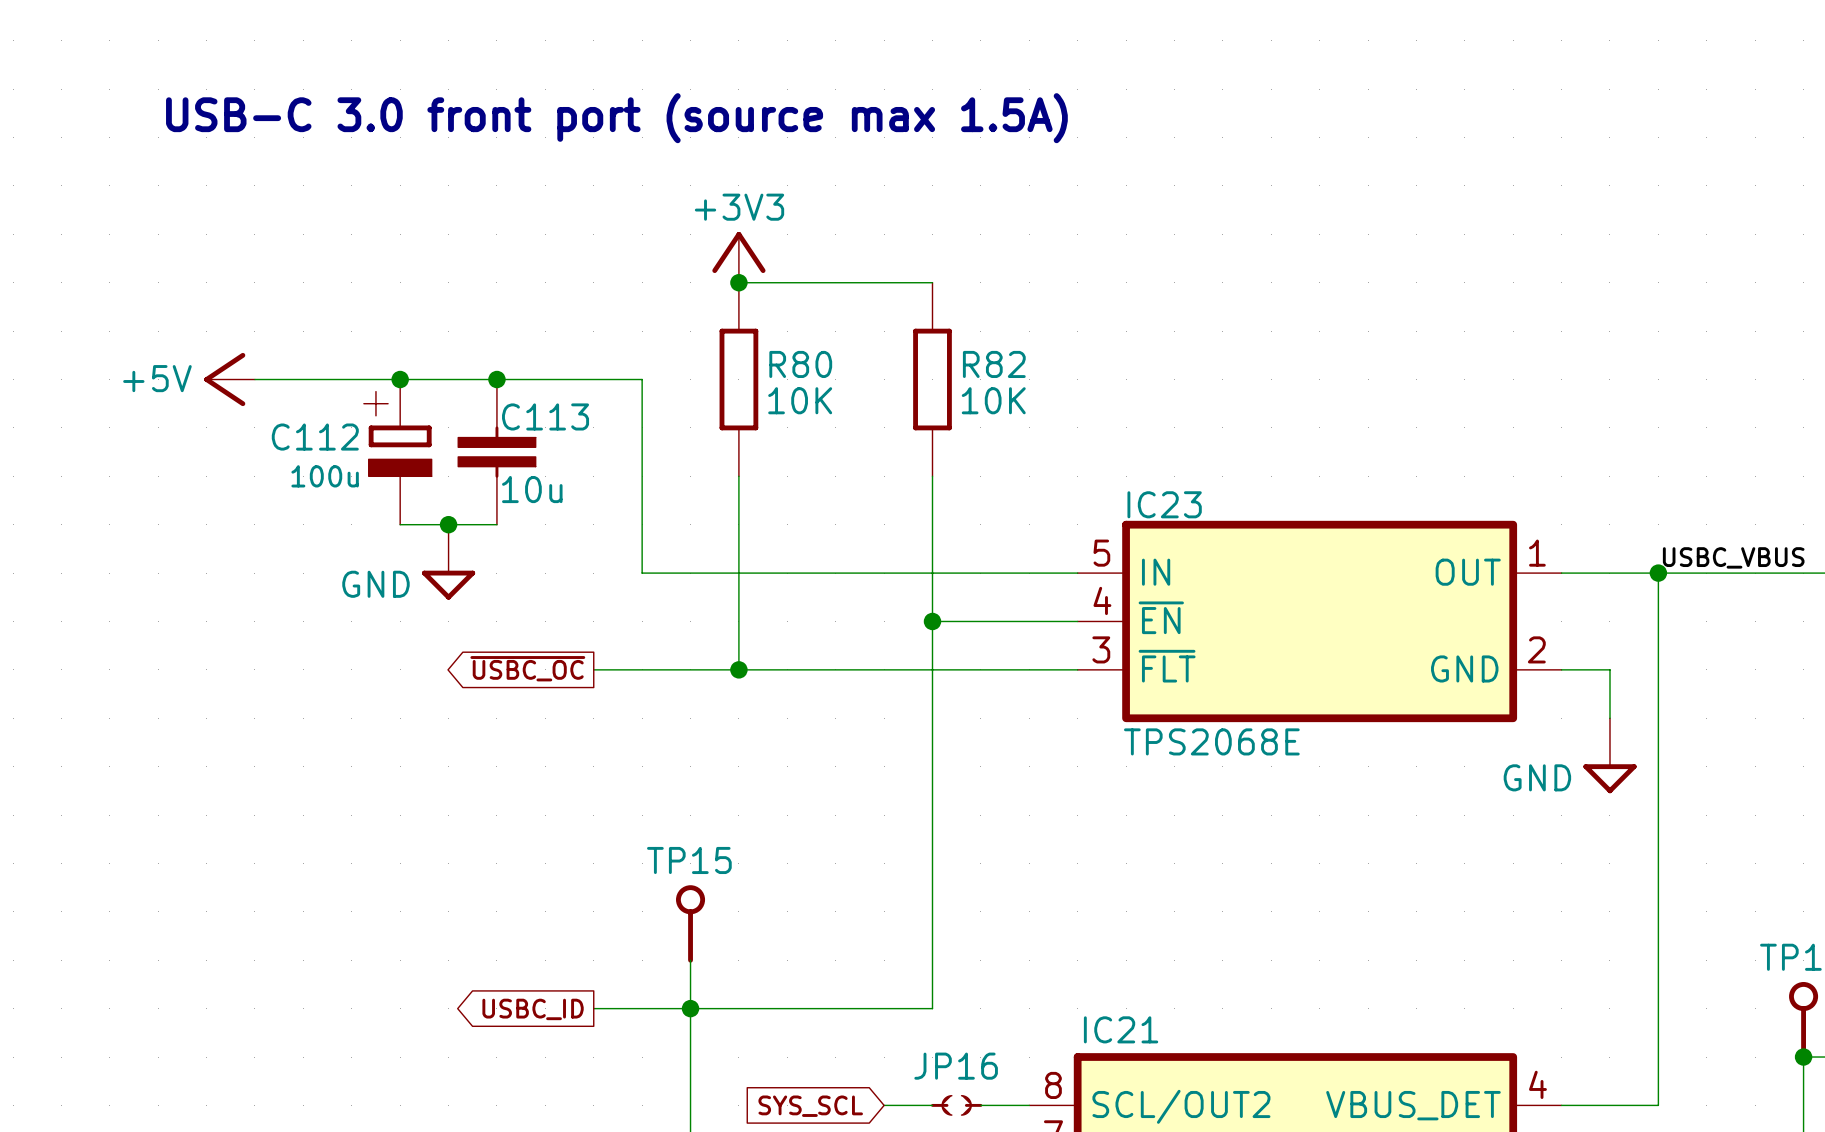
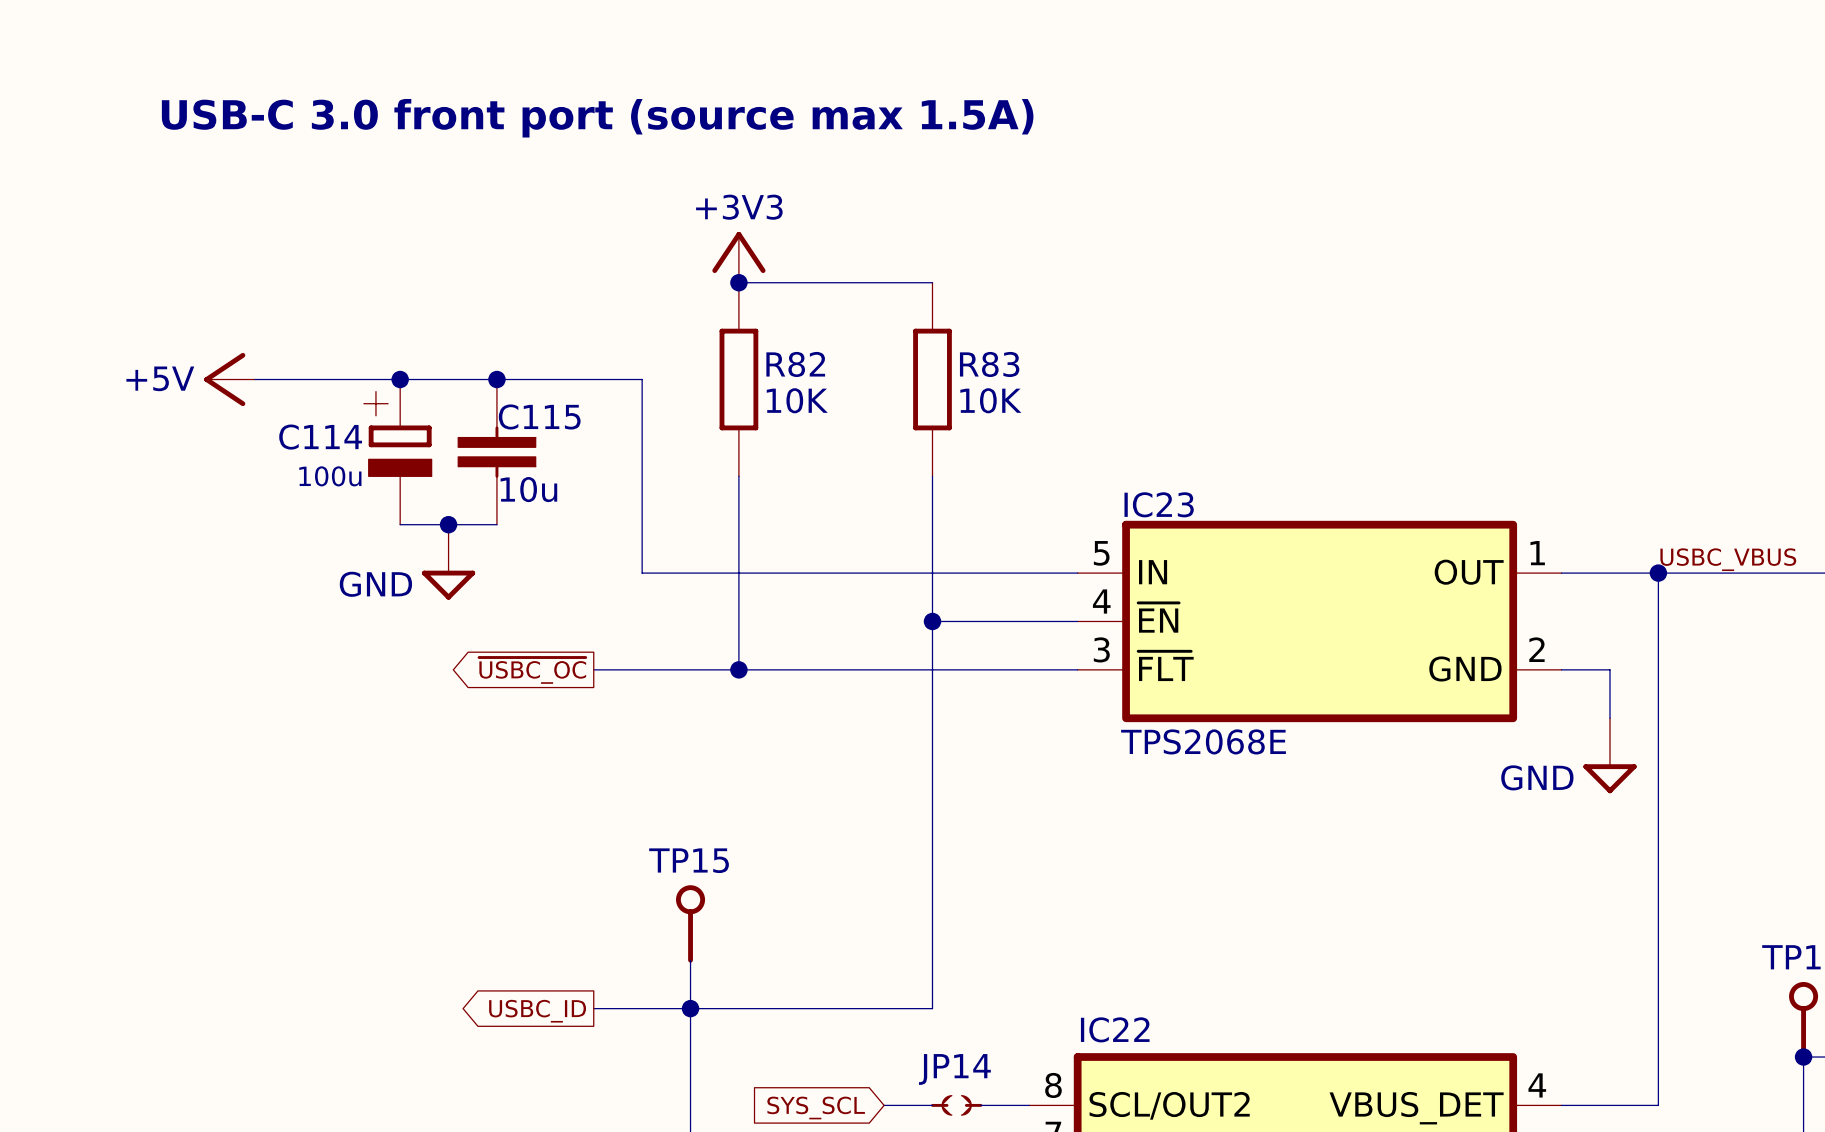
R80 name: R80 (800, 364) -> R82 (795, 364)
R82 name: R82 (994, 364) -> R83 (989, 364)
C113 name: C113 (545, 416) -> C115 (539, 416)
C112 name: C112 (315, 437) -> C114 (320, 437)
IC21 name: IC21 (1121, 1029) -> IC22 (1115, 1029)
JP16 name: JP16 (956, 1066) -> JP14 (954, 1069)

